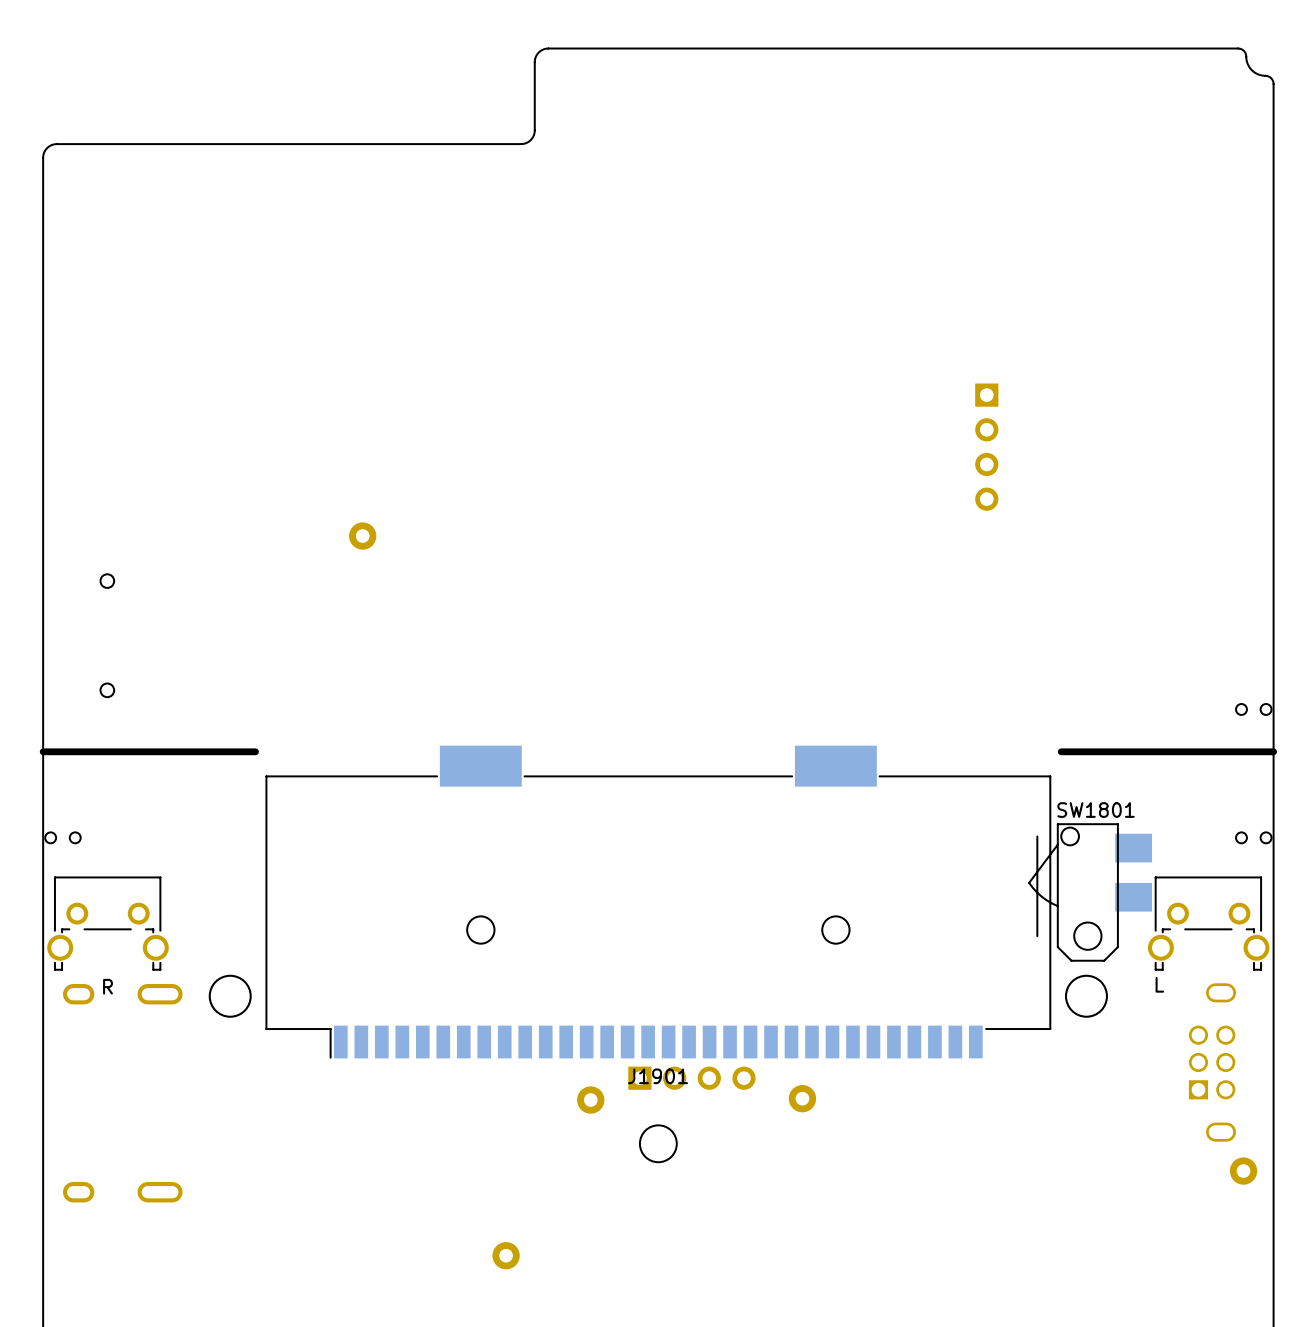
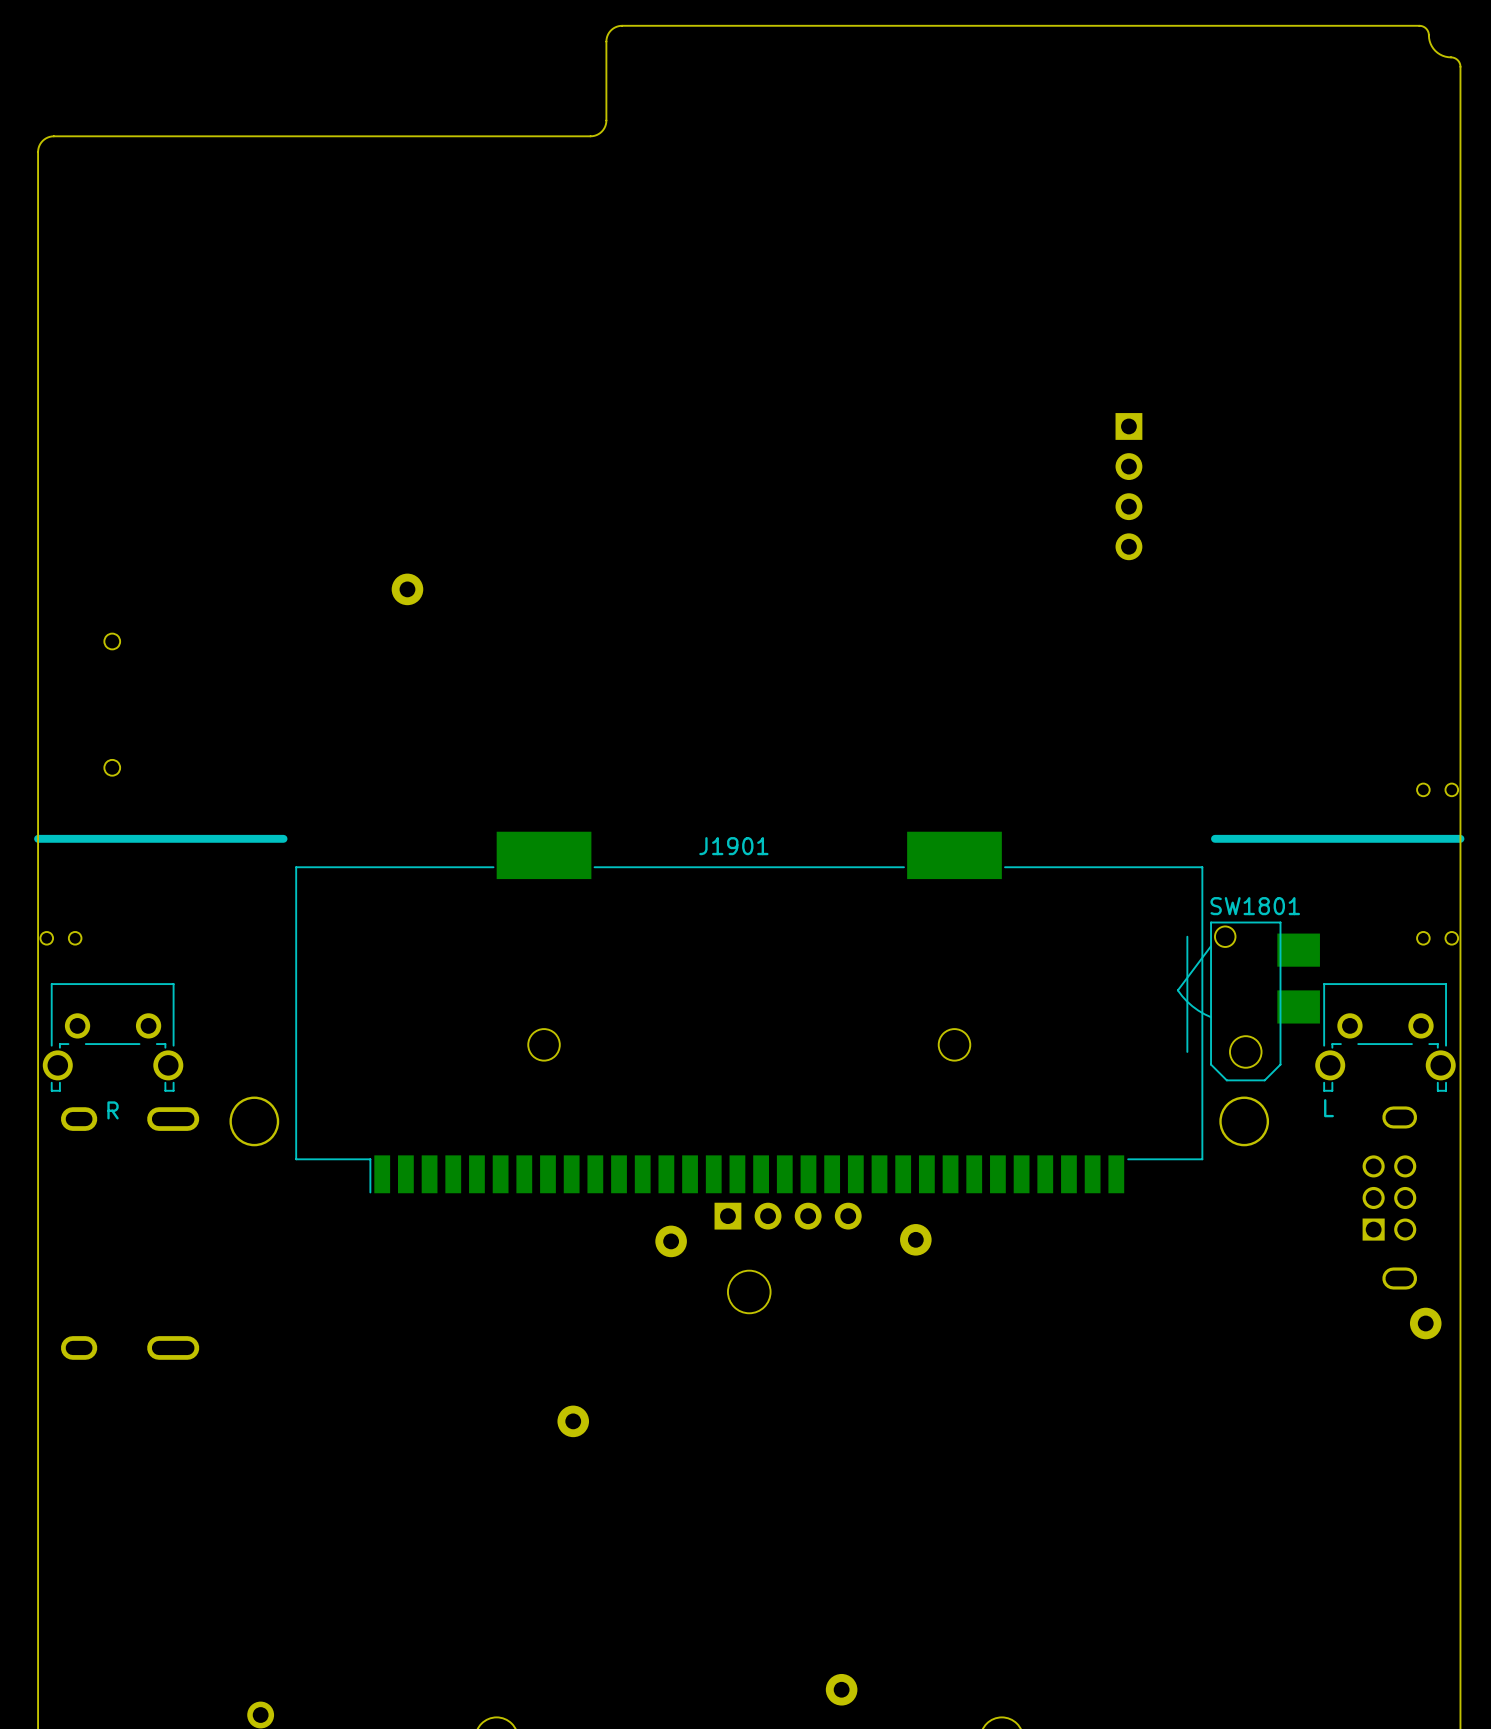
J1901 name position: J1901 (658, 1076) -> J1901 (733, 846)

